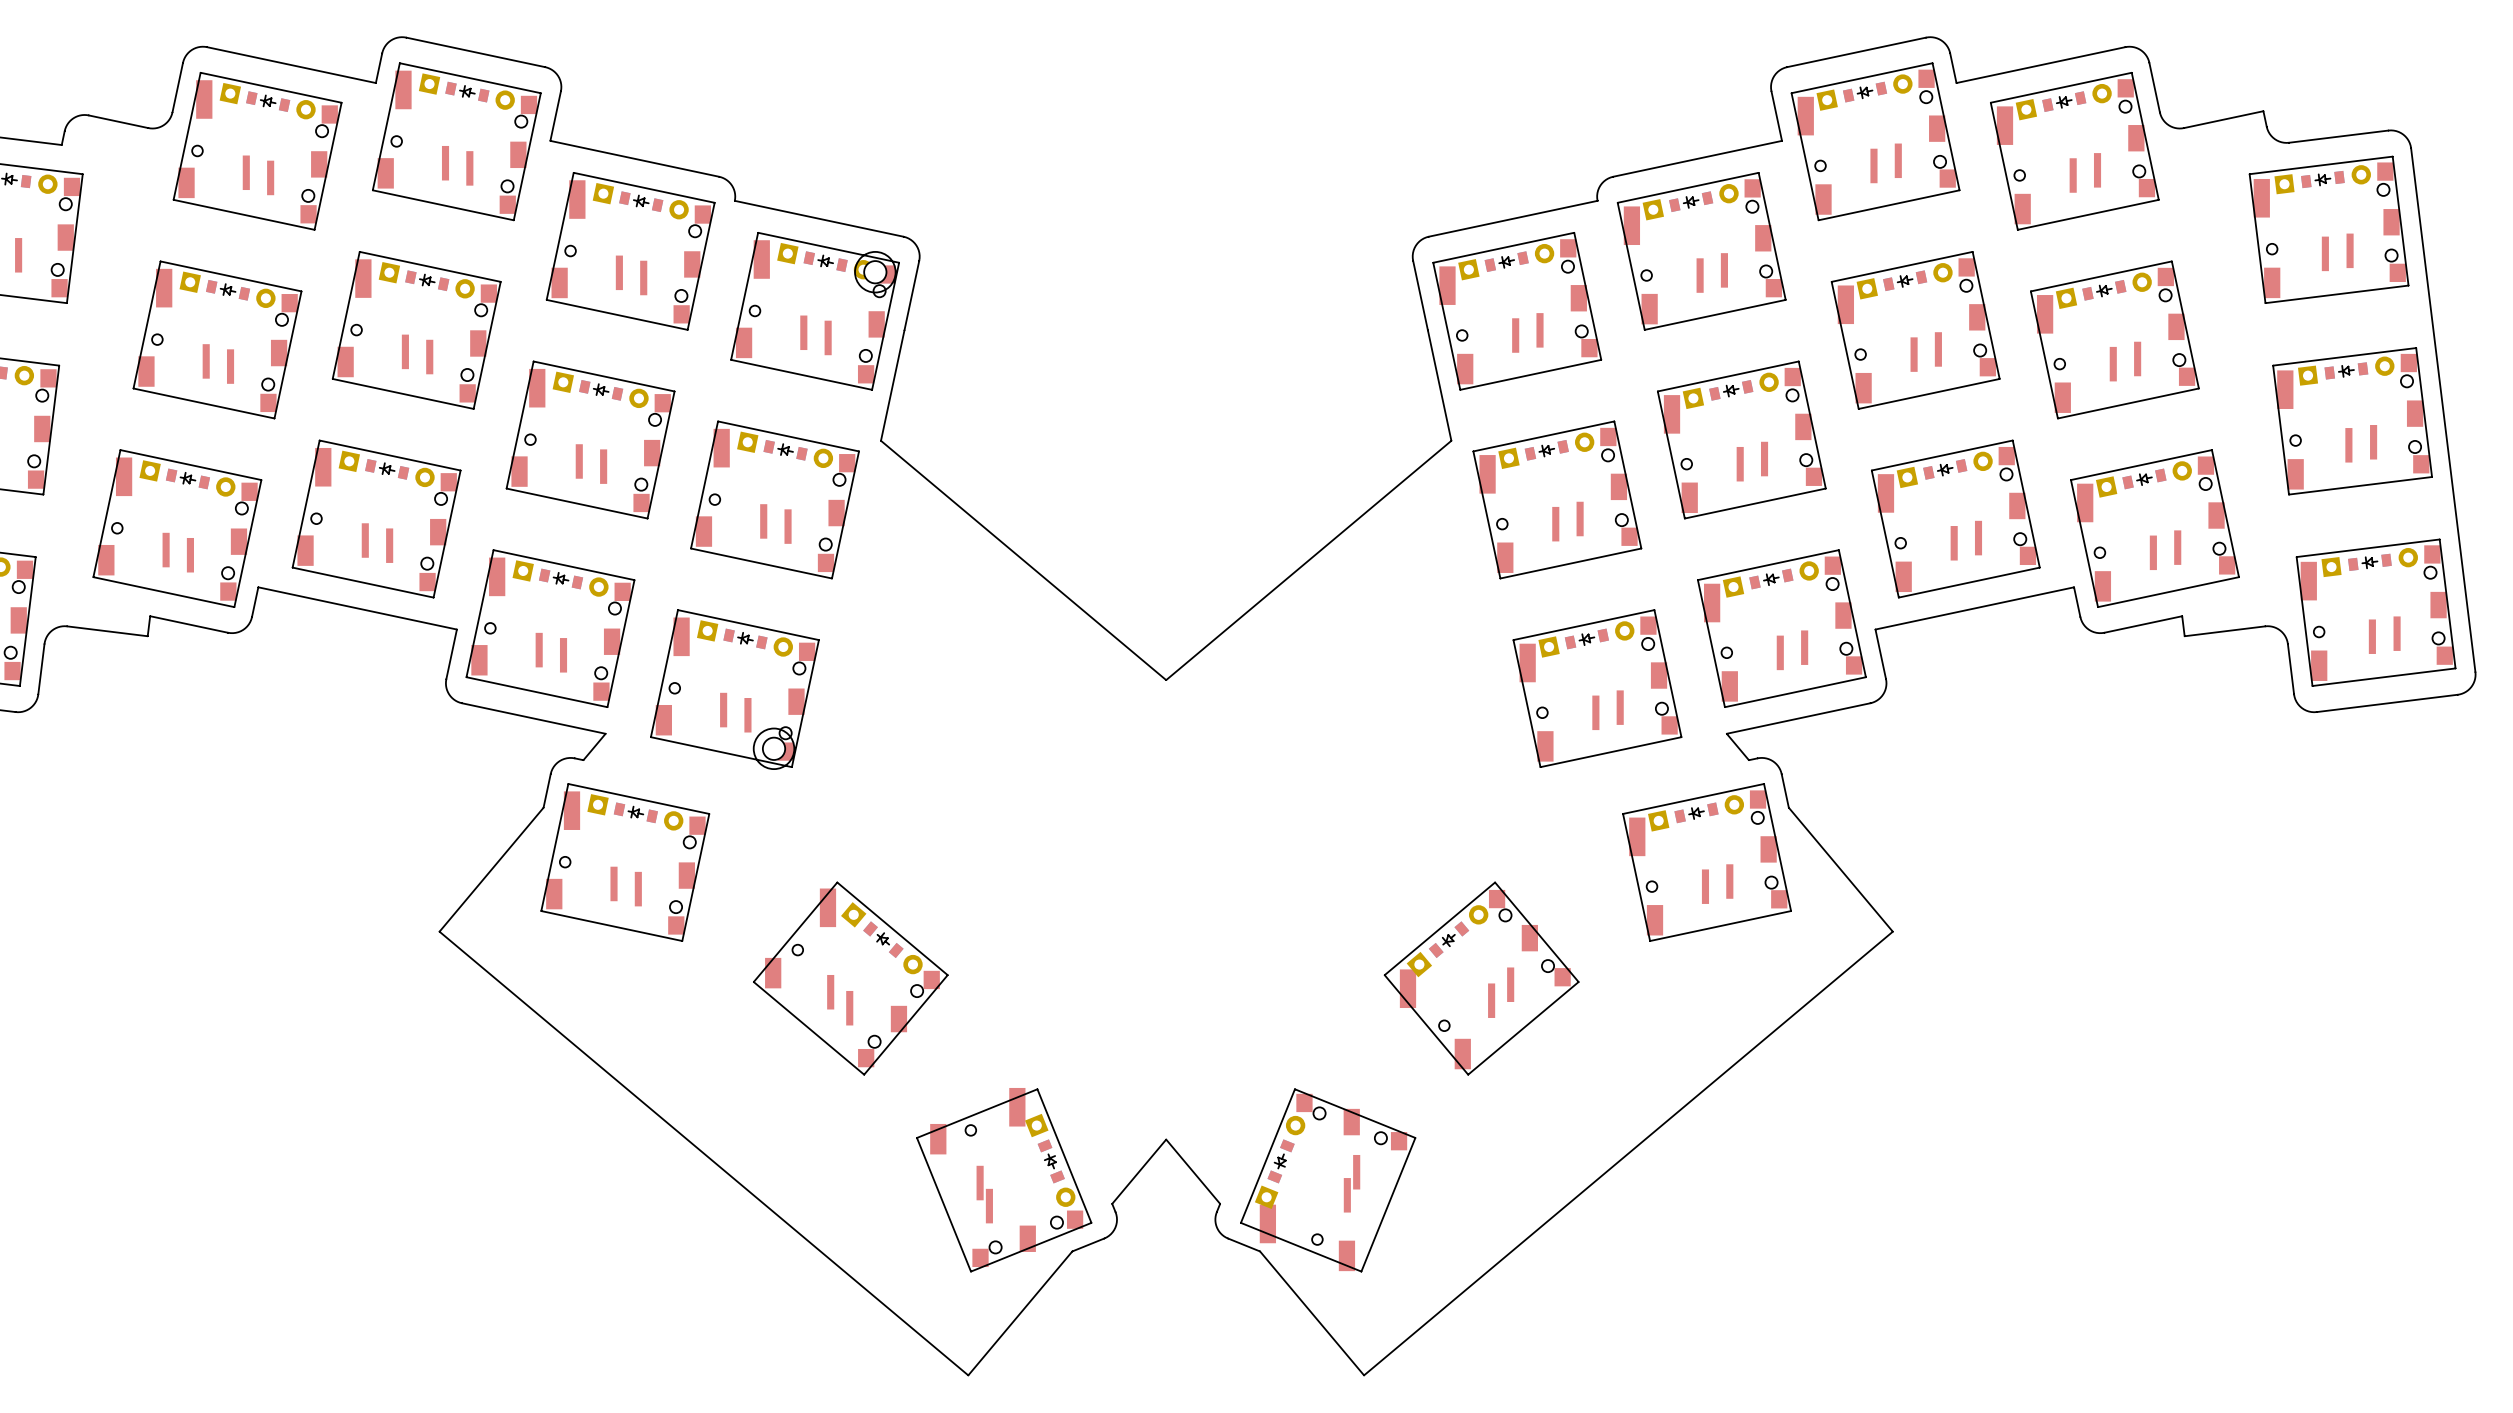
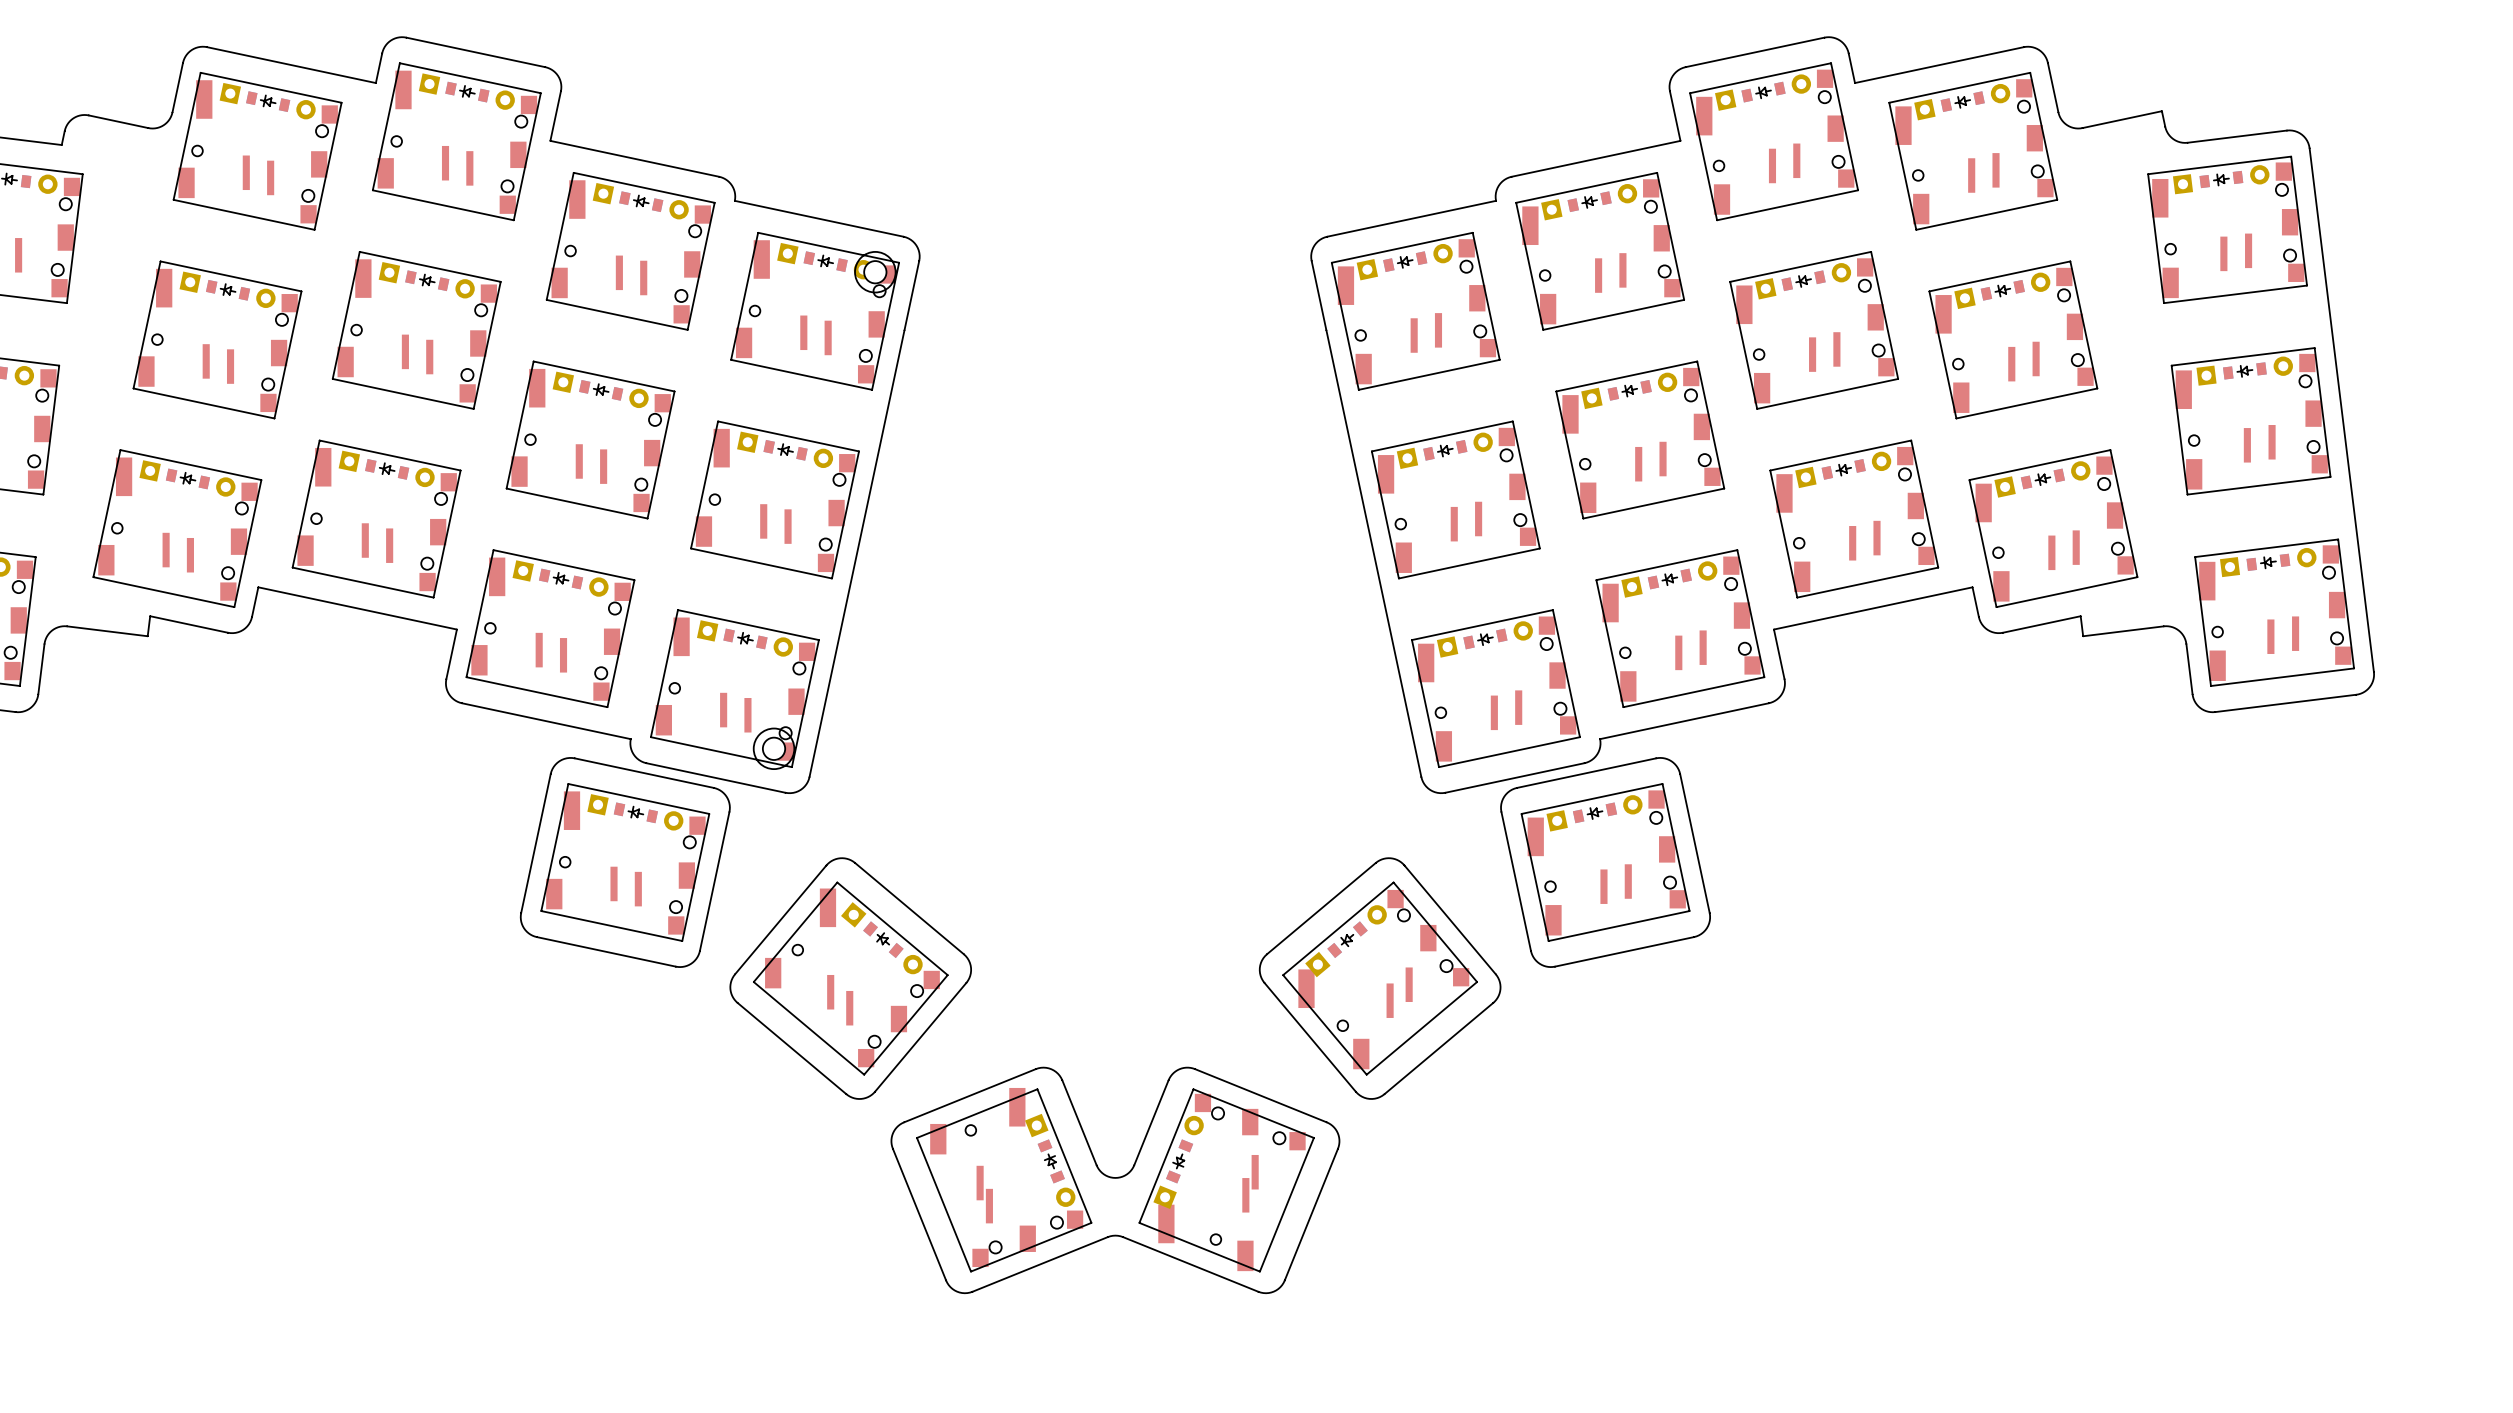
board edge: none -> (1824, 37) (1678, 70) (1671, 78) (1669, 88) (1680, 140) (1509, 177) (1498, 185) (1495, 192) (1496, 200) (1327, 236) (1317, 241) (1313, 247) (1311, 260) (1421, 777) (1426, 786) (1432, 791) (1445, 792) (1584, 763) (1591, 760) (1597, 754) (1600, 747) (1600, 739) (1771, 702) (1781, 694) (1784, 683) (1773, 629) (1972, 587) (1980, 622) (1985, 628) (1995, 632) (2080, 616) (2083, 636) (2163, 626) (2174, 628) (2181, 633) (2185, 641) (2193, 698) (2198, 706) (2208, 711) (2356, 694) (2366, 690) (2372, 683) (2373, 672) (2309, 148) (2305, 138) (2297, 132) (2289, 130) (2180, 142) (2168, 133) (2161, 111) (2082, 128) (2071, 127) (2063, 122) (2059, 114) (2046, 58) (2040, 51) (2030, 46) (1855, 83) (1846, 46) (1835, 38) (1824, 37)
part: none -> (1763, 92)
part: (1864, 92) -> none
part: none -> (1962, 102)
part: (2063, 102) -> none
part: none -> (1774, 141)
part: (1875, 141) -> none
part: none -> (1973, 151)
part: (2074, 151) -> none
part position: (2322, 179) -> (2221, 179)
part: none -> (1589, 202)
part: (1690, 202) -> none
part position: (2329, 229) -> (2227, 229)
part: none -> (1600, 251)
part: (1701, 251) -> none
part: none -> (1404, 262)
part: (1506, 262) -> none
part position: (1904, 281) -> (1803, 281)
part: none -> (2002, 290)
part: (2103, 290) -> none
part: none -> (1415, 311)
part: (1517, 311) -> none
part: none -> (1814, 330)
part: (1915, 330) -> none
part: none -> (2013, 339)
part: (2114, 339) -> none
part position: (2346, 371) -> (2244, 371)
part: none -> (1629, 390)
part: (1730, 390) -> none
part position: (2352, 421) -> (2251, 421)
board edge: (881, 440) (1166, 680) (1451, 440) (1413, 260) (1413, 250) (1419, 241) (1428, 236) (1597, 200) (1597, 192) (1600, 185) (1605, 179) (1613, 176) (1782, 140) (1771, 85) (1775, 73) (1784, 67) (1932, 37) (1943, 41) (1948, 48) (1956, 83) (2132, 46) (2140, 50) (2147, 58) (2160, 114) (2165, 122) (2172, 127) (2184, 128) (2263, 111) (2269, 133) (2281, 142) (2391, 130) (2403, 134) (2410, 145) (2475, 672) (2473, 683) (2468, 690) (2457, 694) (2308, 711) (2301, 707) (2295, 699) (2287, 641) (2283, 633) (2276, 628) (2265, 626) (2184, 636) (2182, 616) (2096, 632) (2089, 629) (2082, 622) (2074, 587) (1875, 629) (1886, 681) (1885, 690) (1878, 699) (1870, 703) (1726, 733) (1748, 760) (1766, 758) (1777, 765) (1781, 774) (1788, 807) (1892, 931) (1364, 1375) (1260, 1251) (1228, 1238) (1220, 1233) (1215, 1221) (1220, 1203) (1166, 1139) (1112, 1203) (1116, 1214) (1116, 1225) (1112, 1232) (1104, 1238) -> (881, 440) (809, 777) (804, 786) (795, 792) (785, 792) (646, 763) (639, 760) (633, 754) (630, 747) (630, 739) (605, 733)
part: none -> (1640, 440)
part: (1741, 440) -> none
part: none -> (1444, 450)
part: (1546, 450) -> none
part: none -> (1843, 469)
part: (1944, 469) -> none
part: none -> (2042, 479)
part: (2143, 479) -> none
part: none -> (1455, 499)
part: (1557, 499) -> none
part: none -> (1854, 519)
part: (1955, 519) -> none
part: none -> (2053, 528)
part: (2154, 528) -> none
part position: (2369, 562) -> (2268, 562)
part: none -> (1669, 579)
part: (1770, 579) -> none
part position: (2376, 612) -> (2274, 612)
part: none -> (1680, 628)
part: (1781, 628) -> none
part: none -> (1484, 639)
part: (1586, 639) -> none
part: none -> (1495, 688)
part: (1597, 688) -> none
board edge: (605, 733) (583, 760) -> (543, 807) (520, 915) (521, 924) (526, 931) (536, 937) (675, 966) (687, 965) (694, 960) (699, 950) (729, 811) (727, 798) (722, 791) (713, 787) (583, 760)
board edge: none -> (1656, 758) (1517, 787) (1507, 792) (1502, 799) (1501, 811) (1530, 950) (1534, 959) (1541, 964) (1555, 966) (1694, 937) (1703, 932) (1708, 925) (1709, 913) (1679, 771) (1676, 765) (1669, 760) (1656, 758)
board edge: (543, 807) (439, 931) (968, 1375) (1072, 1251) -> (1104, 1238) (1112, 1235) (1120, 1236) (1258, 1291) (1266, 1293) (1273, 1291) (1280, 1287) (1284, 1280) (1337, 1148) (1339, 1139) (1337, 1133) (1334, 1127) (1326, 1122) (1188, 1067) (1179, 1069) (1170, 1076) (1133, 1167) (1128, 1173) (1120, 1177) (1108, 1176) (1098, 1169) (1061, 1077) (1055, 1071) (1048, 1068) (1035, 1069) (904, 1122) (895, 1129) (891, 1137) (892, 1148) (946, 1280) (952, 1288) (959, 1292) (970, 1292) (1072, 1251)
part: none -> (1594, 813)
part: (1696, 813) -> none
board edge: none -> (855, 862) (963, 954) (968, 960) (971, 970) (966, 982) (875, 1091) (867, 1097) (859, 1098) (846, 1094) (737, 1002) (732, 995) (730, 986) (735, 974) (828, 863) (835, 859) (842, 858) (855, 862)
board edge: none -> (1375, 862) (1266, 954) (1262, 960) (1259, 970) (1264, 982) (1355, 1091) (1362, 1096) (1372, 1098) (1384, 1094) (1493, 1002) (1498, 995) (1500, 986) (1495, 974) (1402, 863) (1390, 858) (1383, 858) (1375, 862)
part: none -> (1605, 862)
part: (1707, 862) -> none
part position: (1447, 941) -> (1346, 941)
part position: (1481, 978) -> (1380, 978)
part position: (1280, 1162) -> (1178, 1162)
part position: (1328, 1180) -> (1226, 1180)

